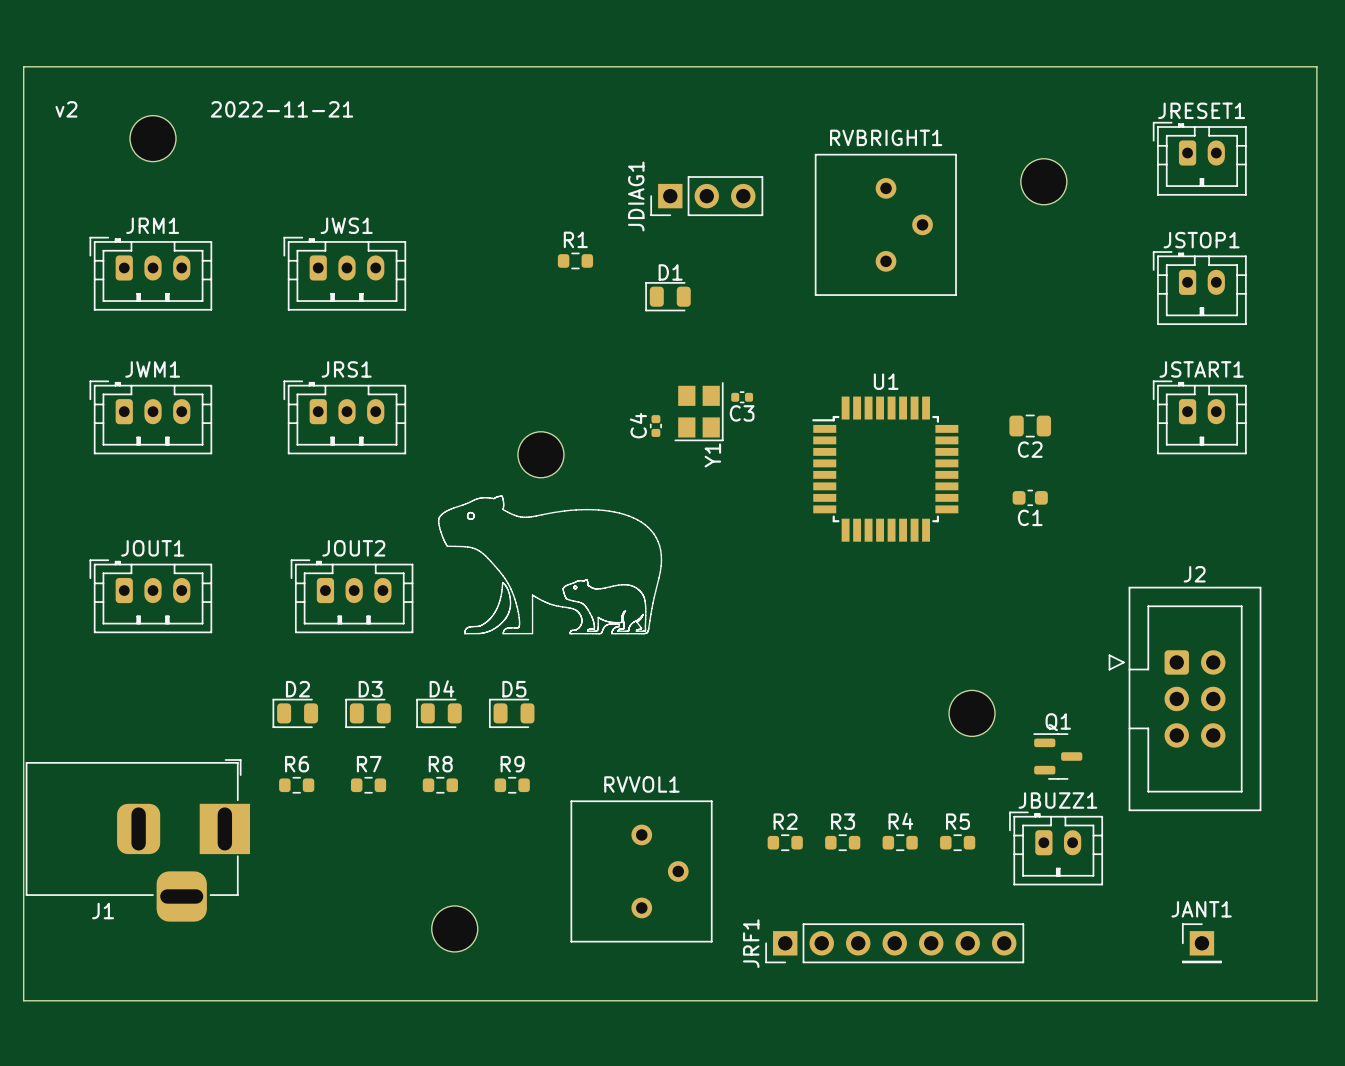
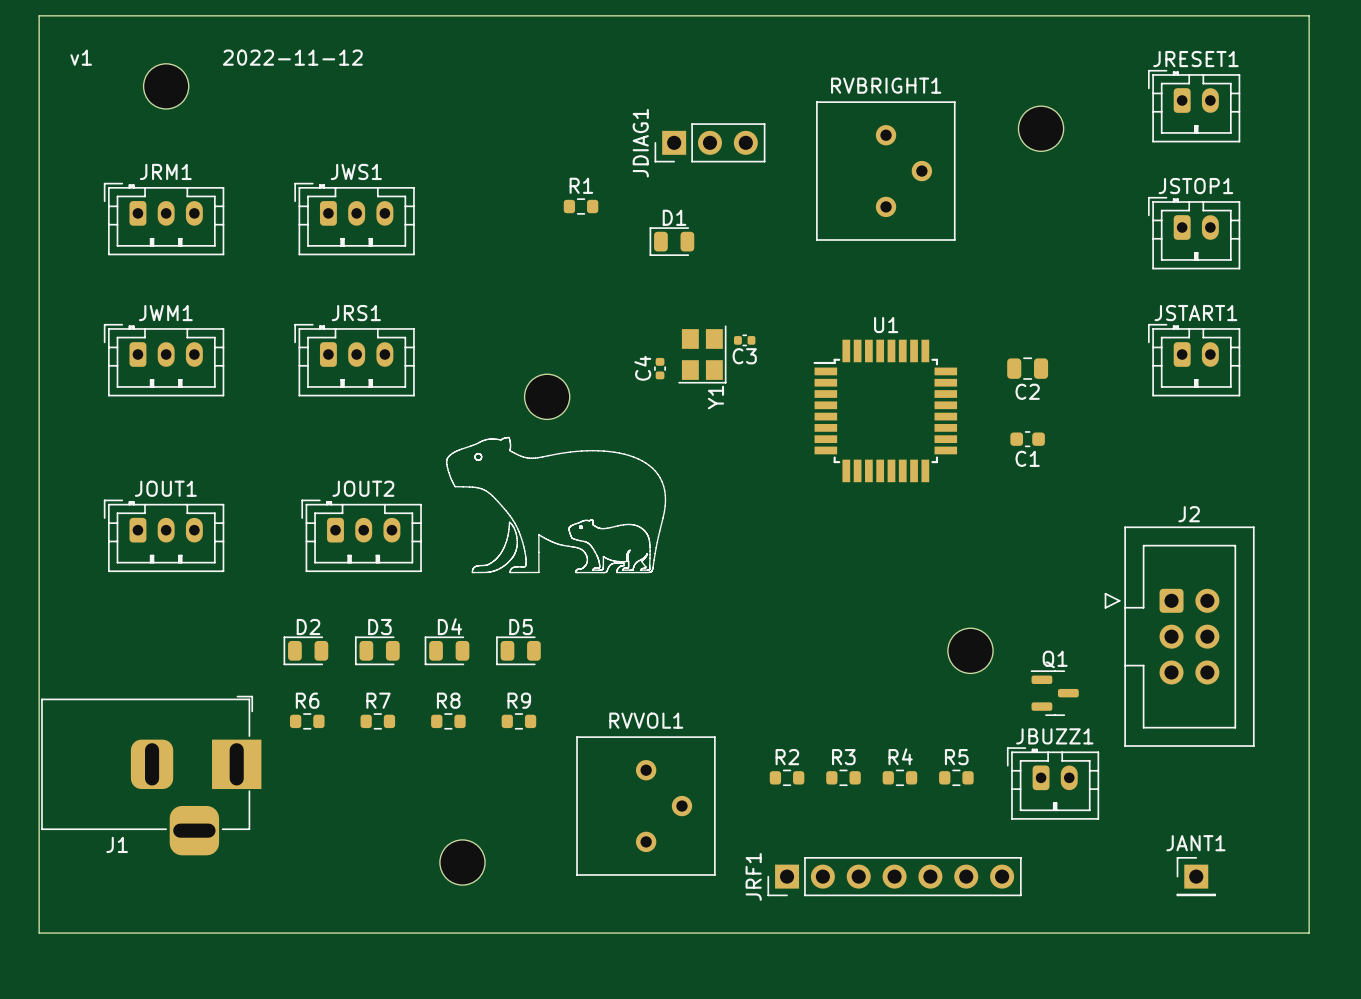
text: v2 (66, 109) -> v1 (81, 57)
text: 2022-11-21 (281, 109) -> 2022-11-12 (292, 57)

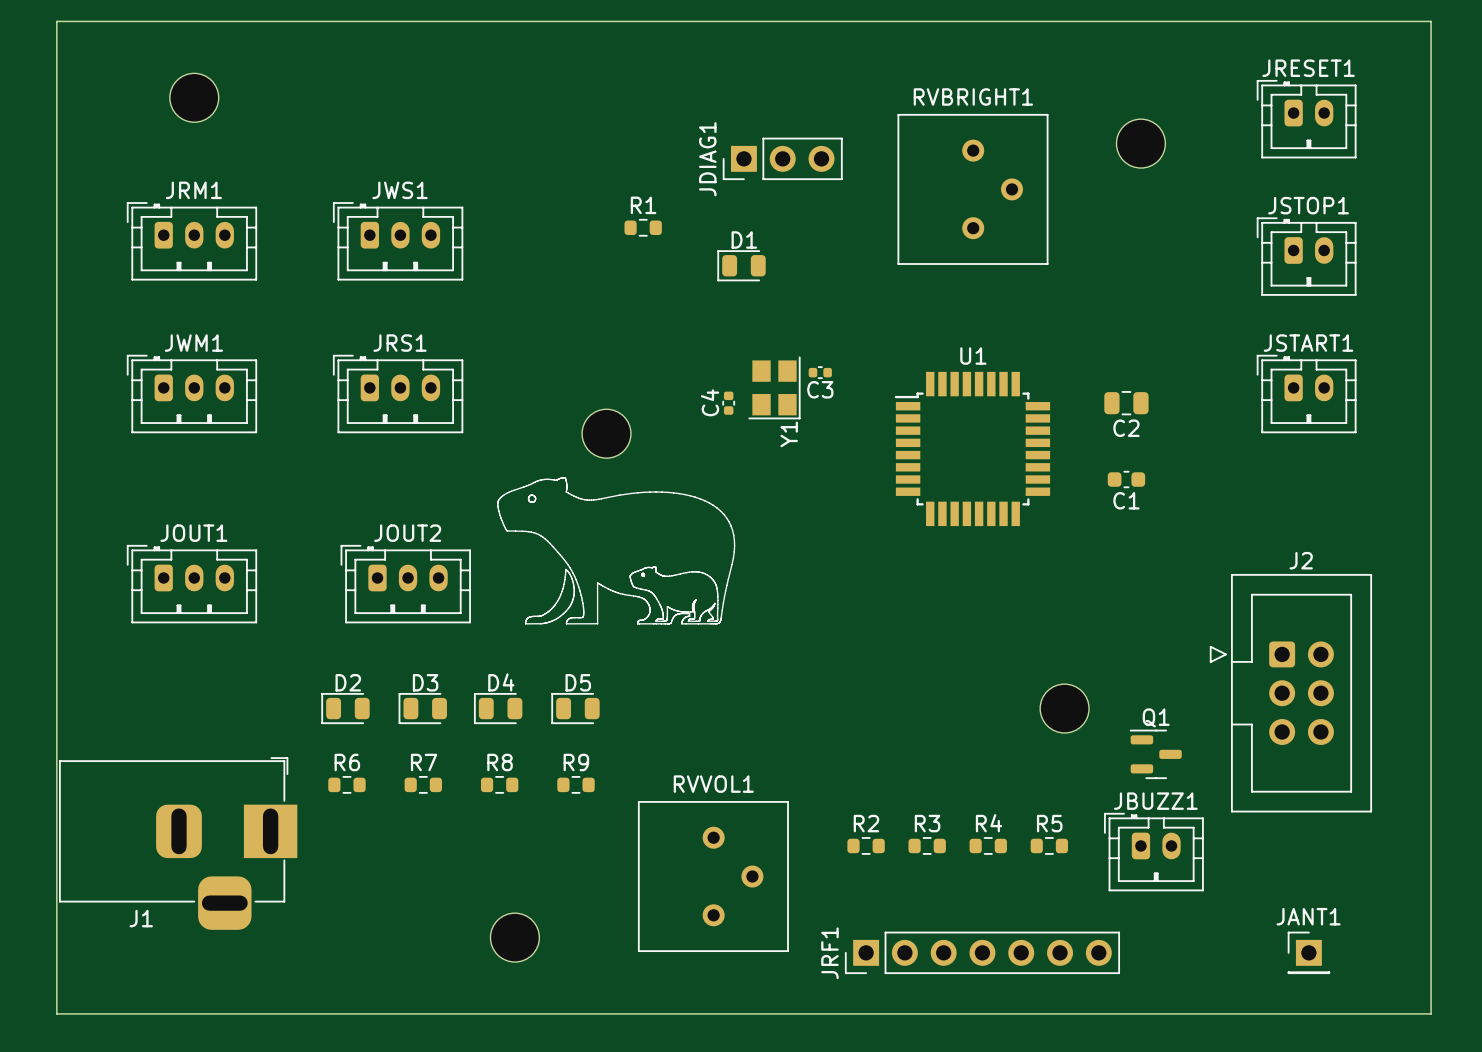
text: v1 (81, 57) -> none
text: 2022-11-12 (292, 57) -> none

